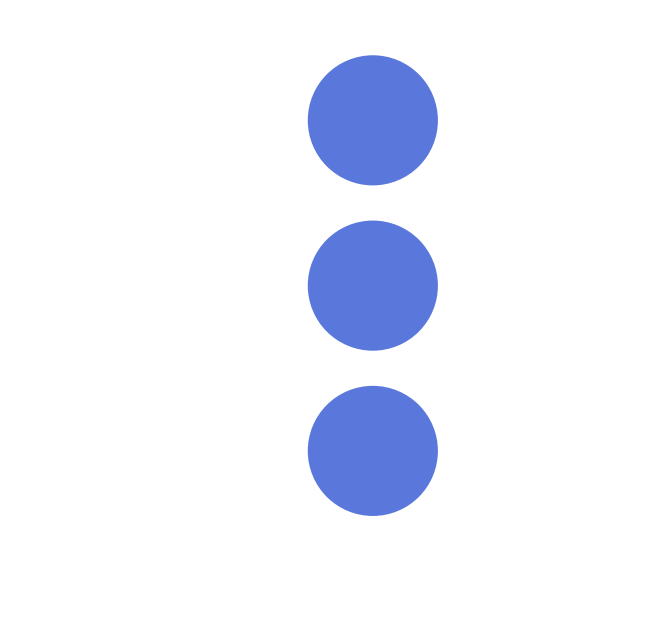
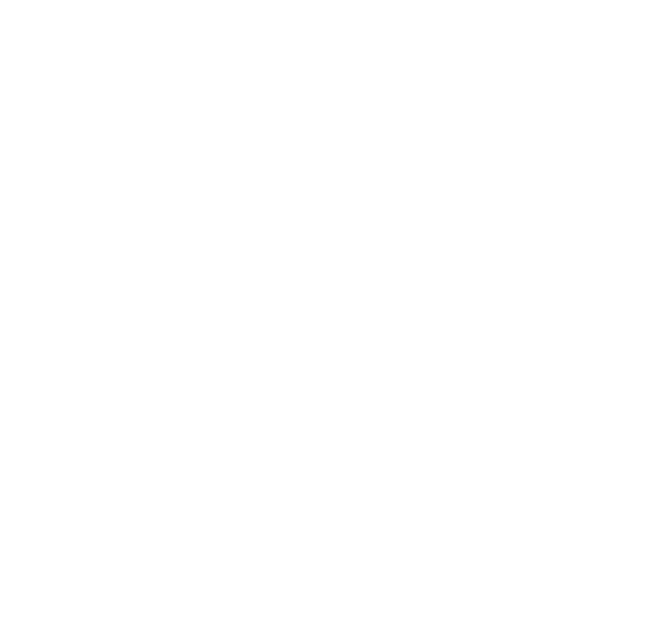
part: (372, 120) -> none
part: (372, 285) -> none
part: (372, 450) -> none

